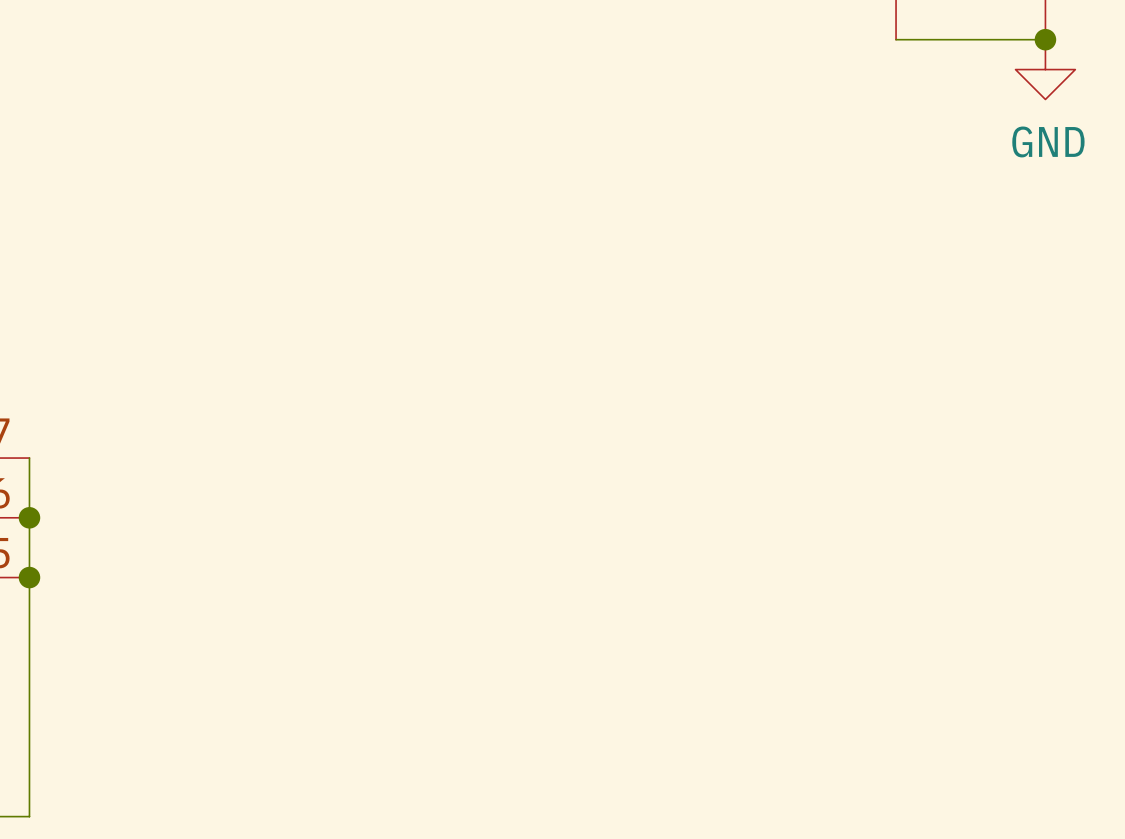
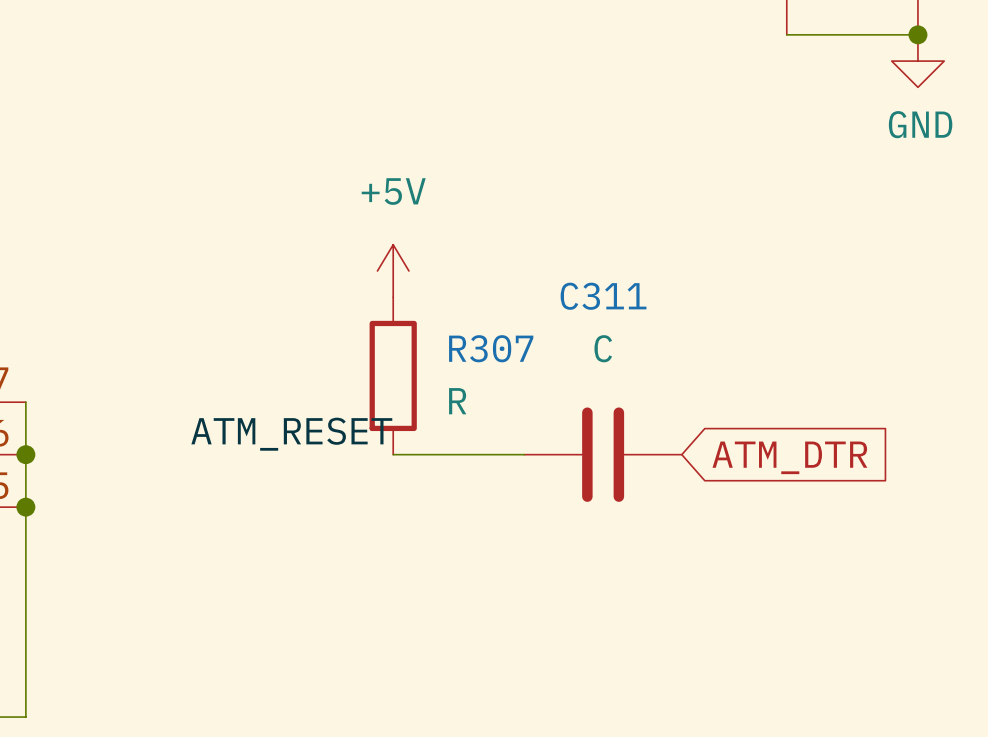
power symbol: none -> +5V (393, 270)
R307: none -> R (393, 375)
label: none -> ATM_RESET (291, 434)
wire: none -> (393, 454) (524, 454)
C311: none -> C (603, 454)
global label: none -> ATM_DTR (789, 457)

